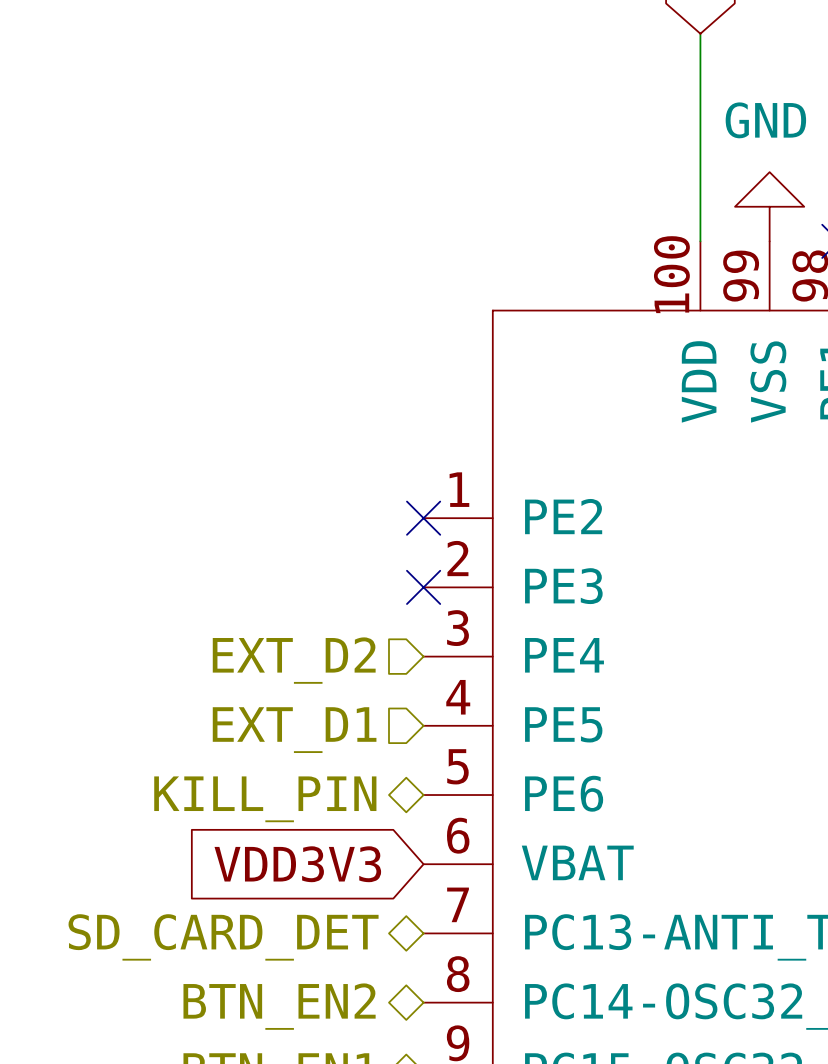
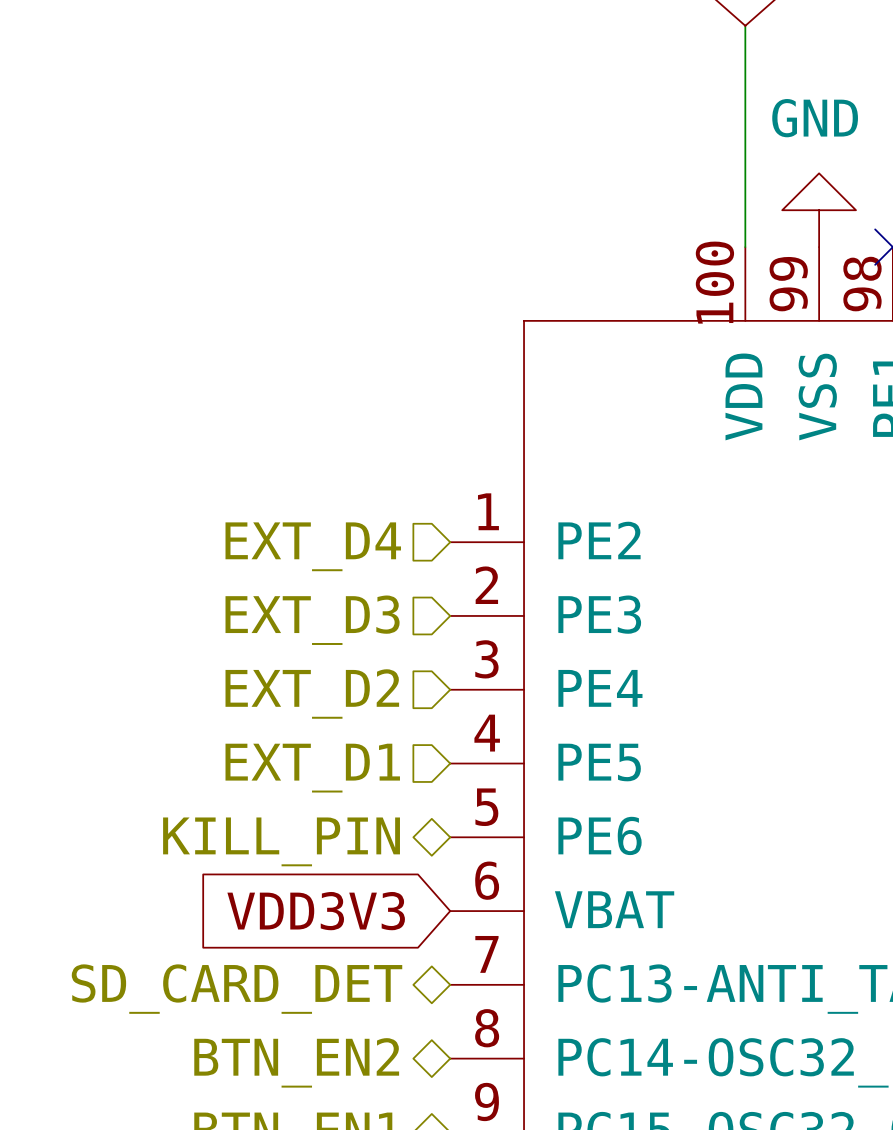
no-connect mark: (423, 518) -> none
hierarchical label: none -> EXT_D4 (313, 546)
no-connect mark: (423, 587) -> none
hierarchical label: none -> EXT_D3 (312, 620)

